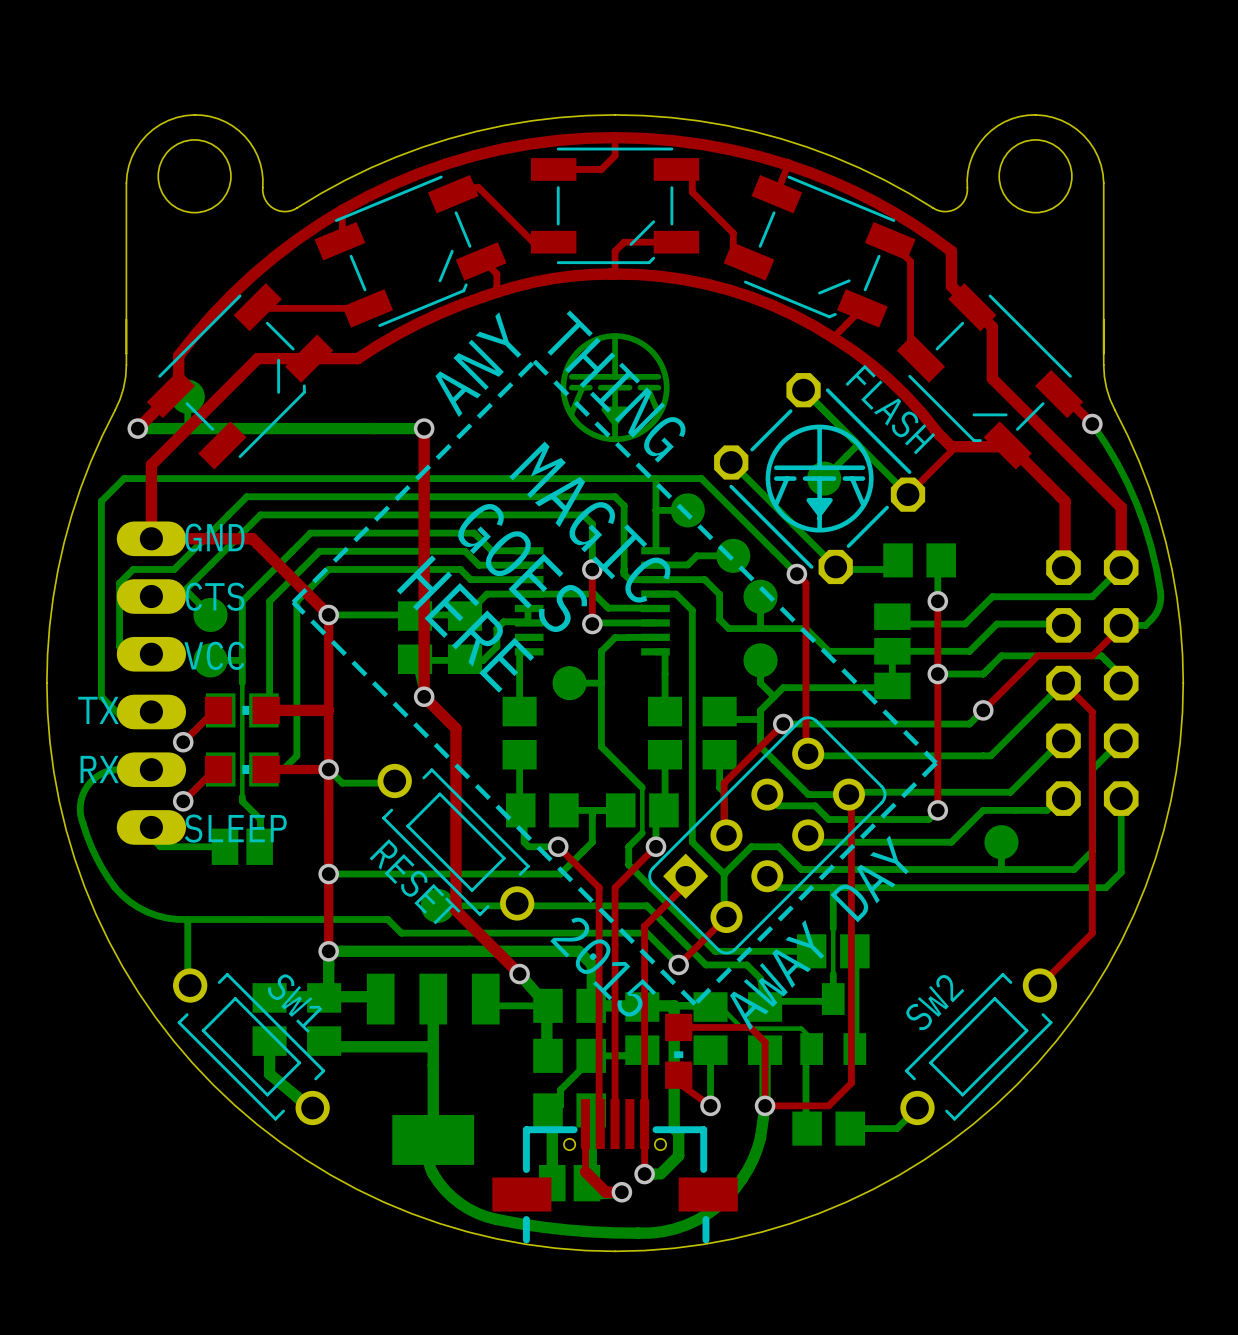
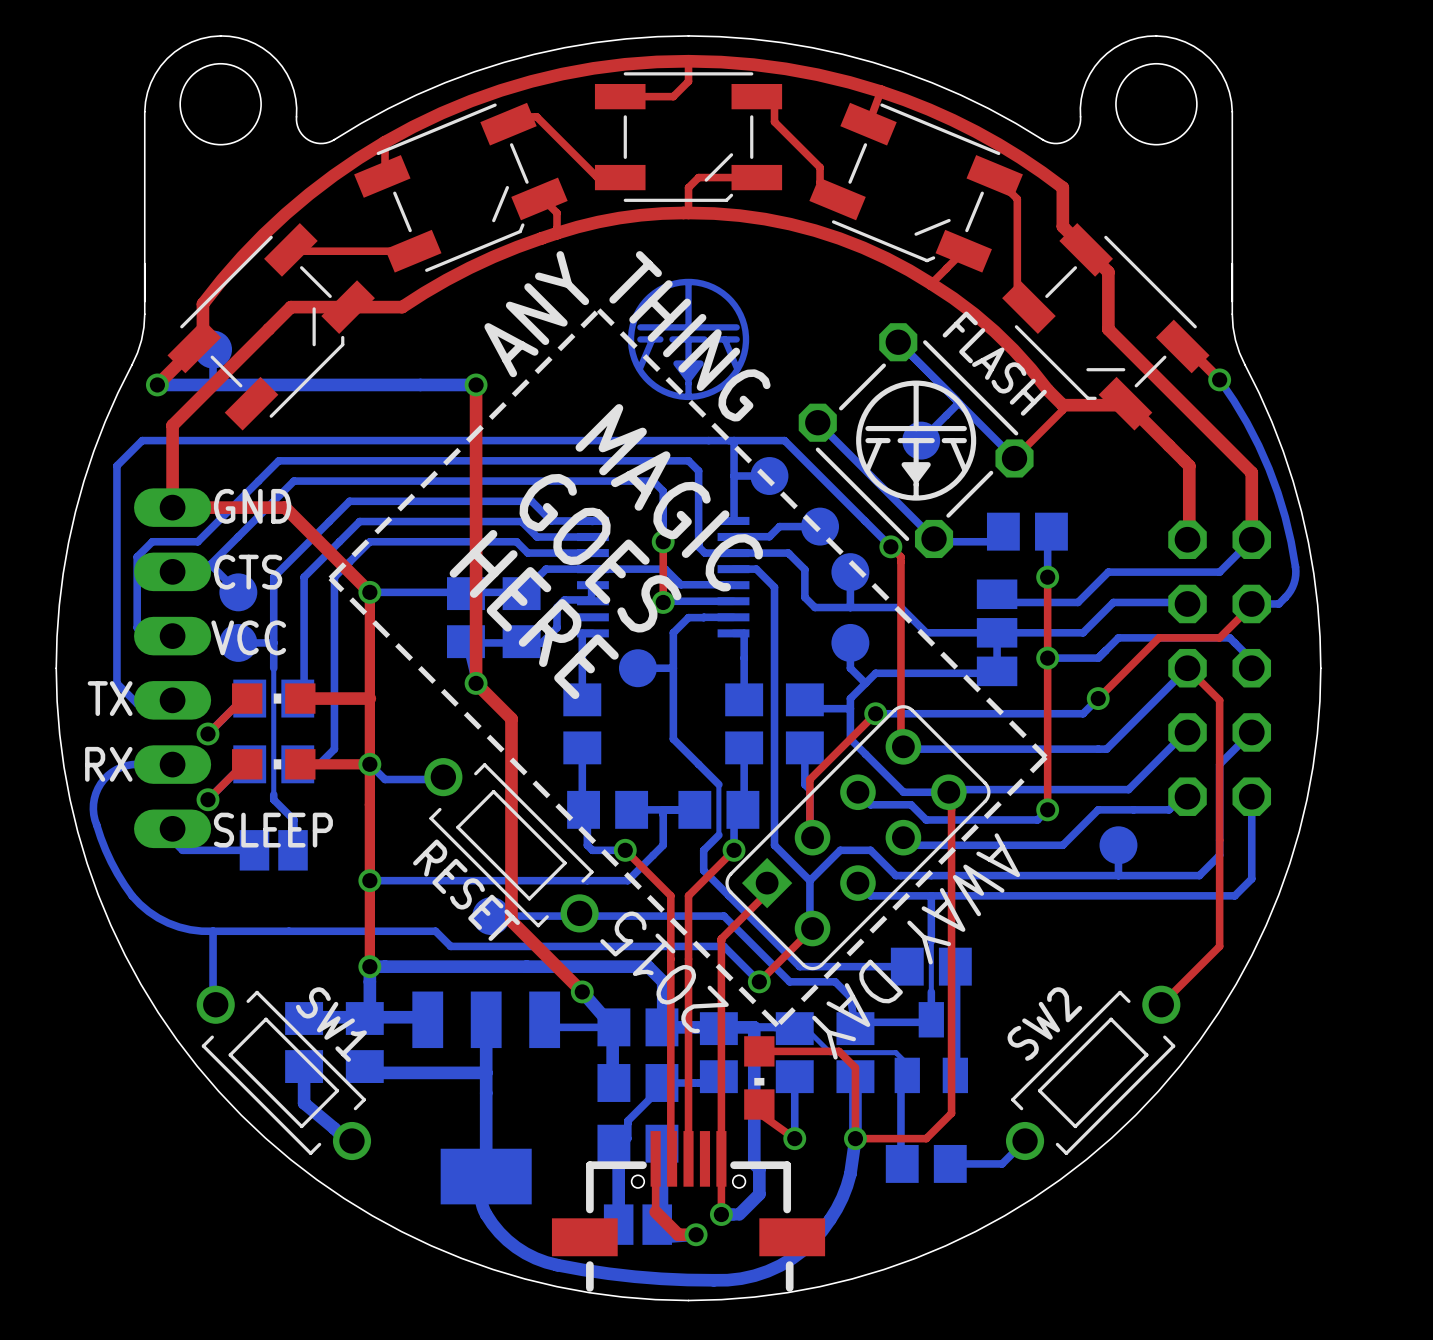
text rotation: 0° (819, 932) -> 180° (916, 946)
text rotation: 0° (603, 967) -> 180° (664, 972)

